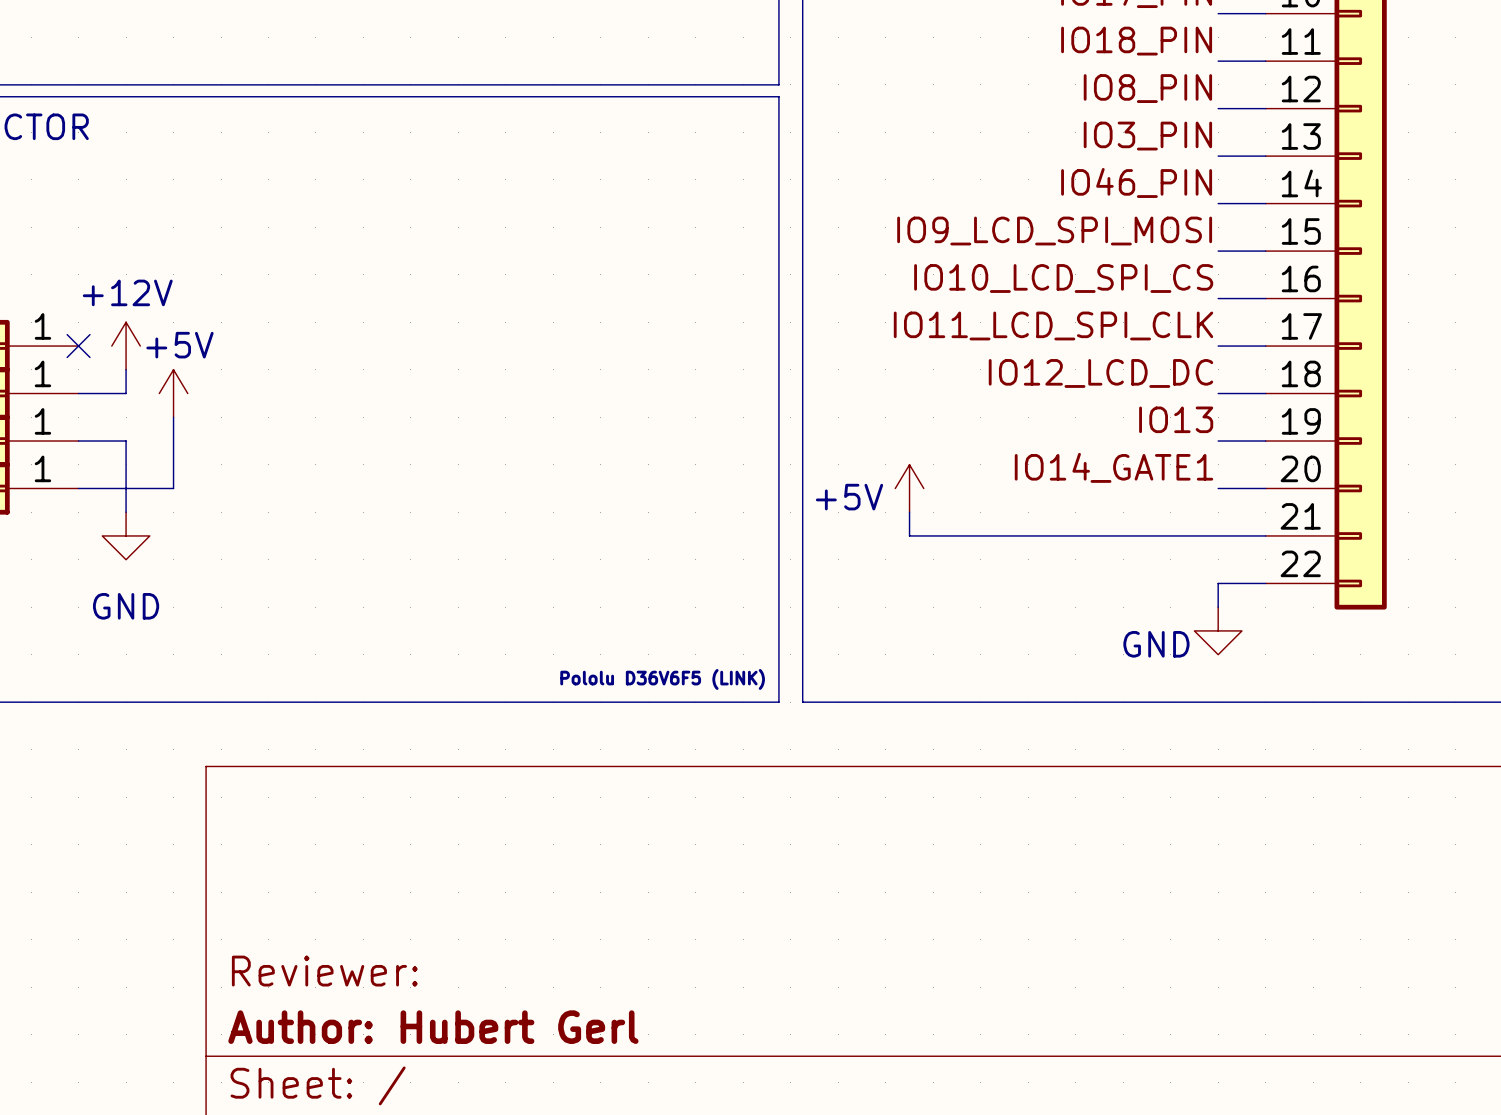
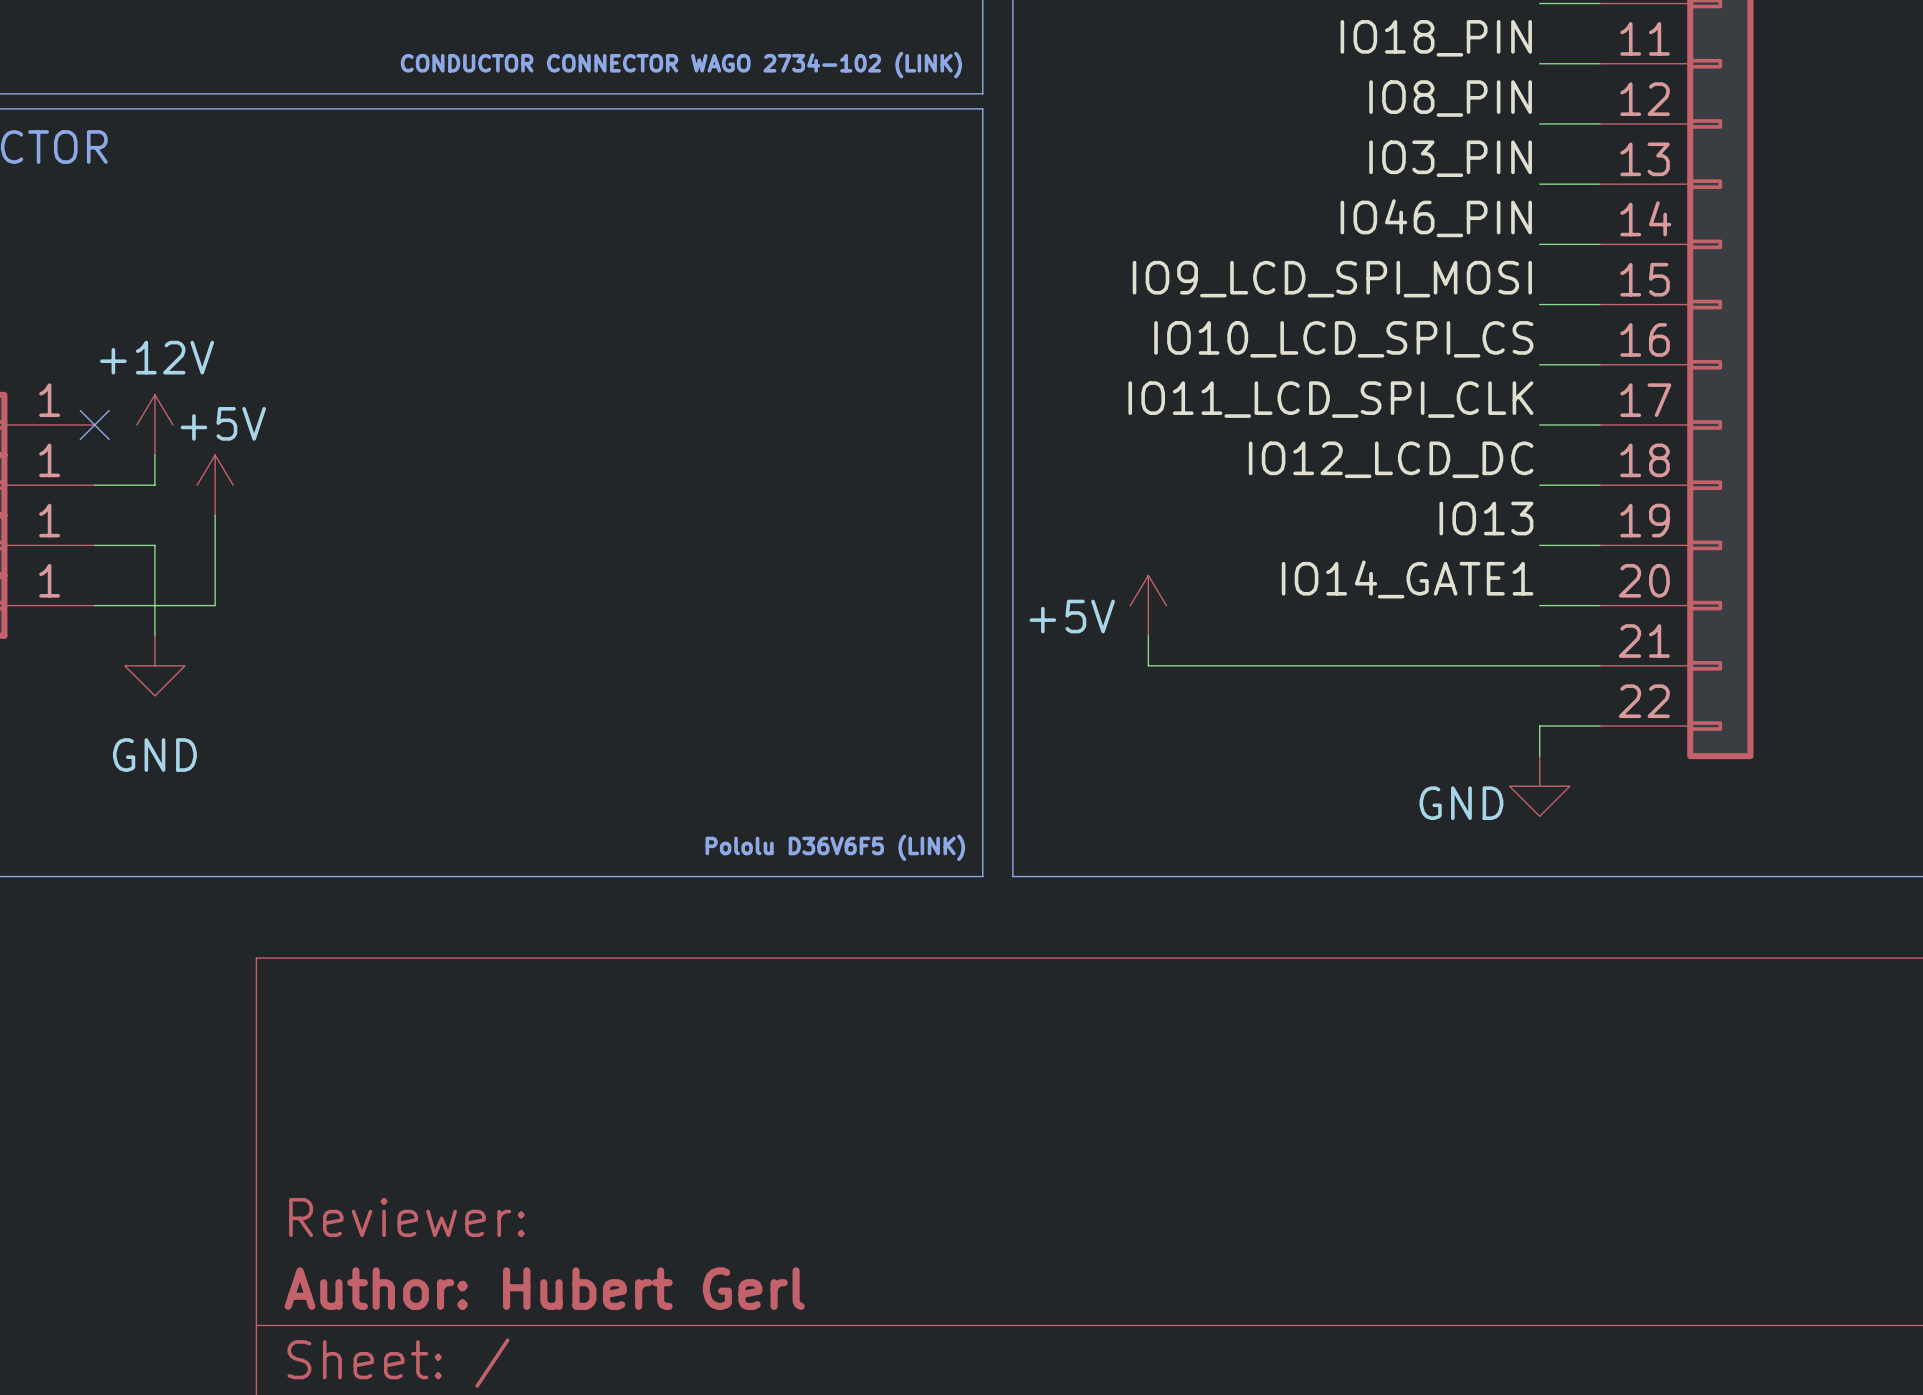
text: none -> CONDUCTOR CONNECTOR WAGO 2734-102 (LINK) (681, 65)

